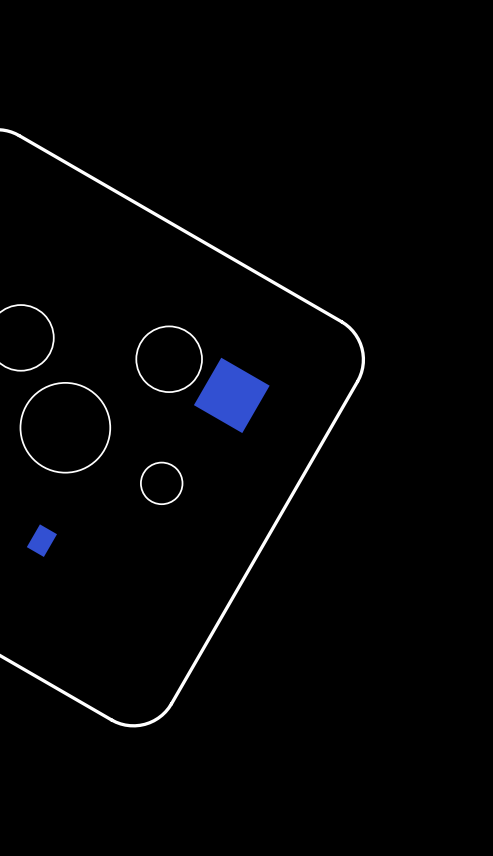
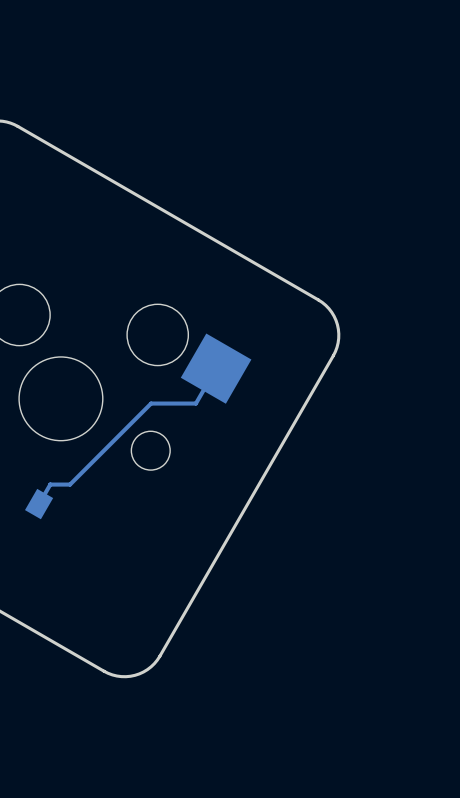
bottom track: none -> (216, 368) (195, 403) (151, 403) (70, 484) (50, 484) (39, 504)

